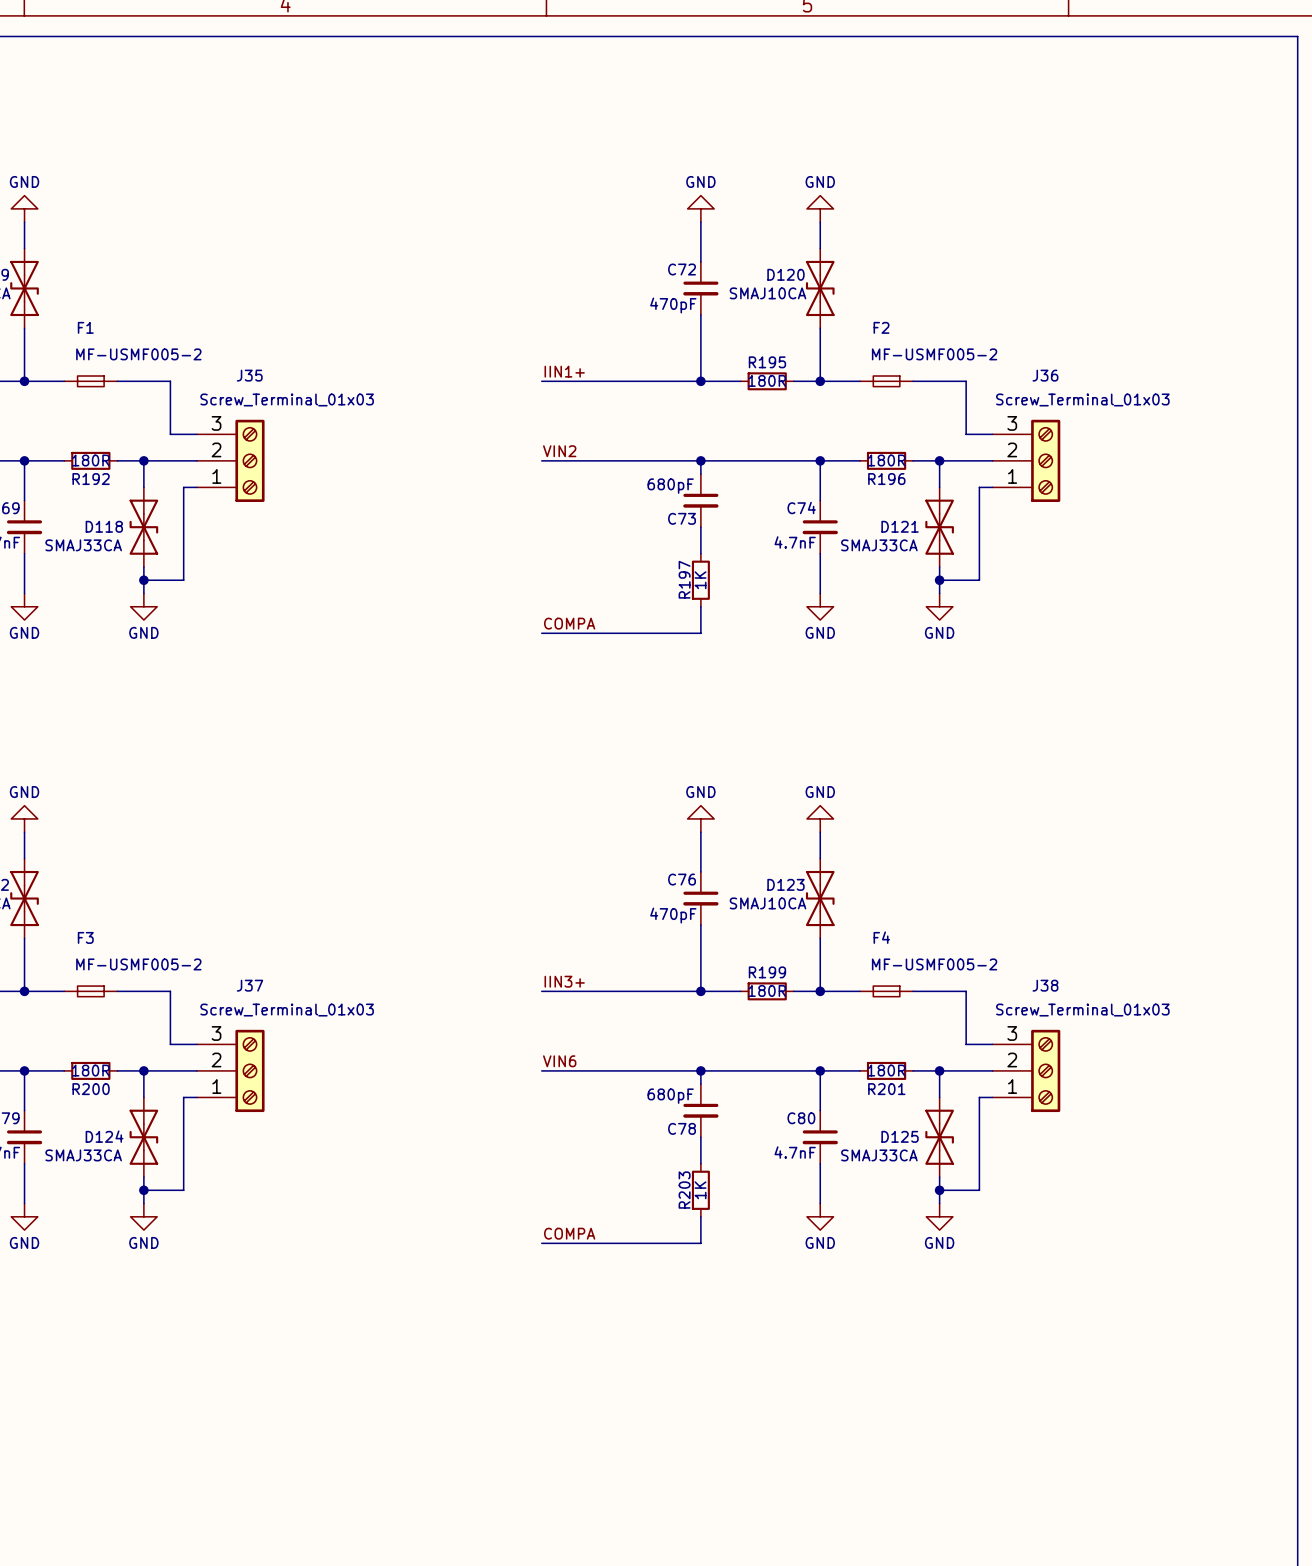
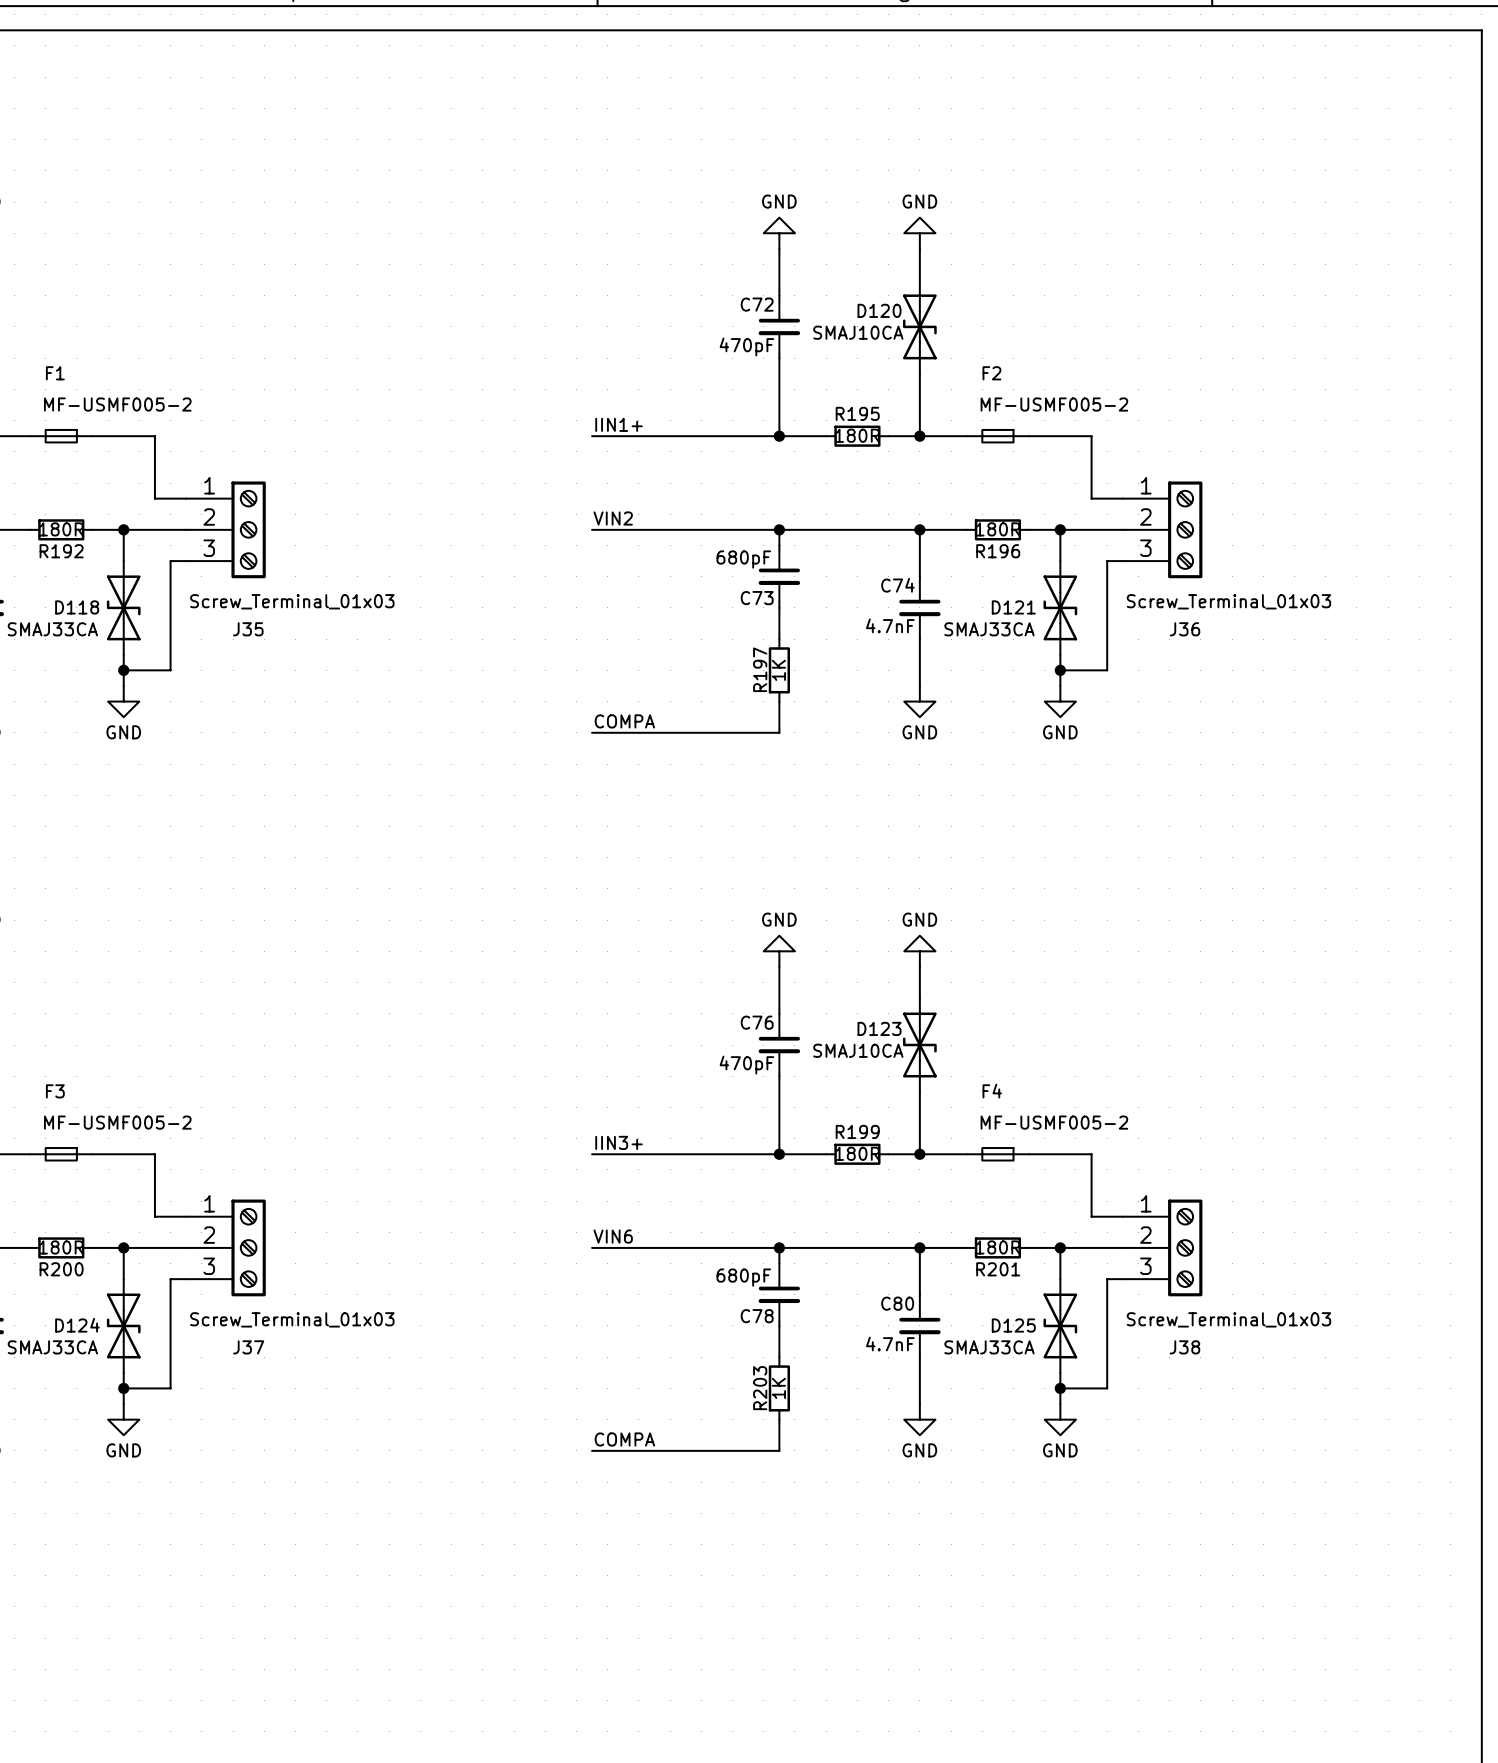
J35 flip: as is (249, 460) -> up-down (248, 529)
J36 flip: as is (1045, 460) -> up-down (1185, 529)
J37 flip: as is (249, 1070) -> up-down (248, 1247)
J38 flip: as is (1045, 1070) -> up-down (1185, 1247)

